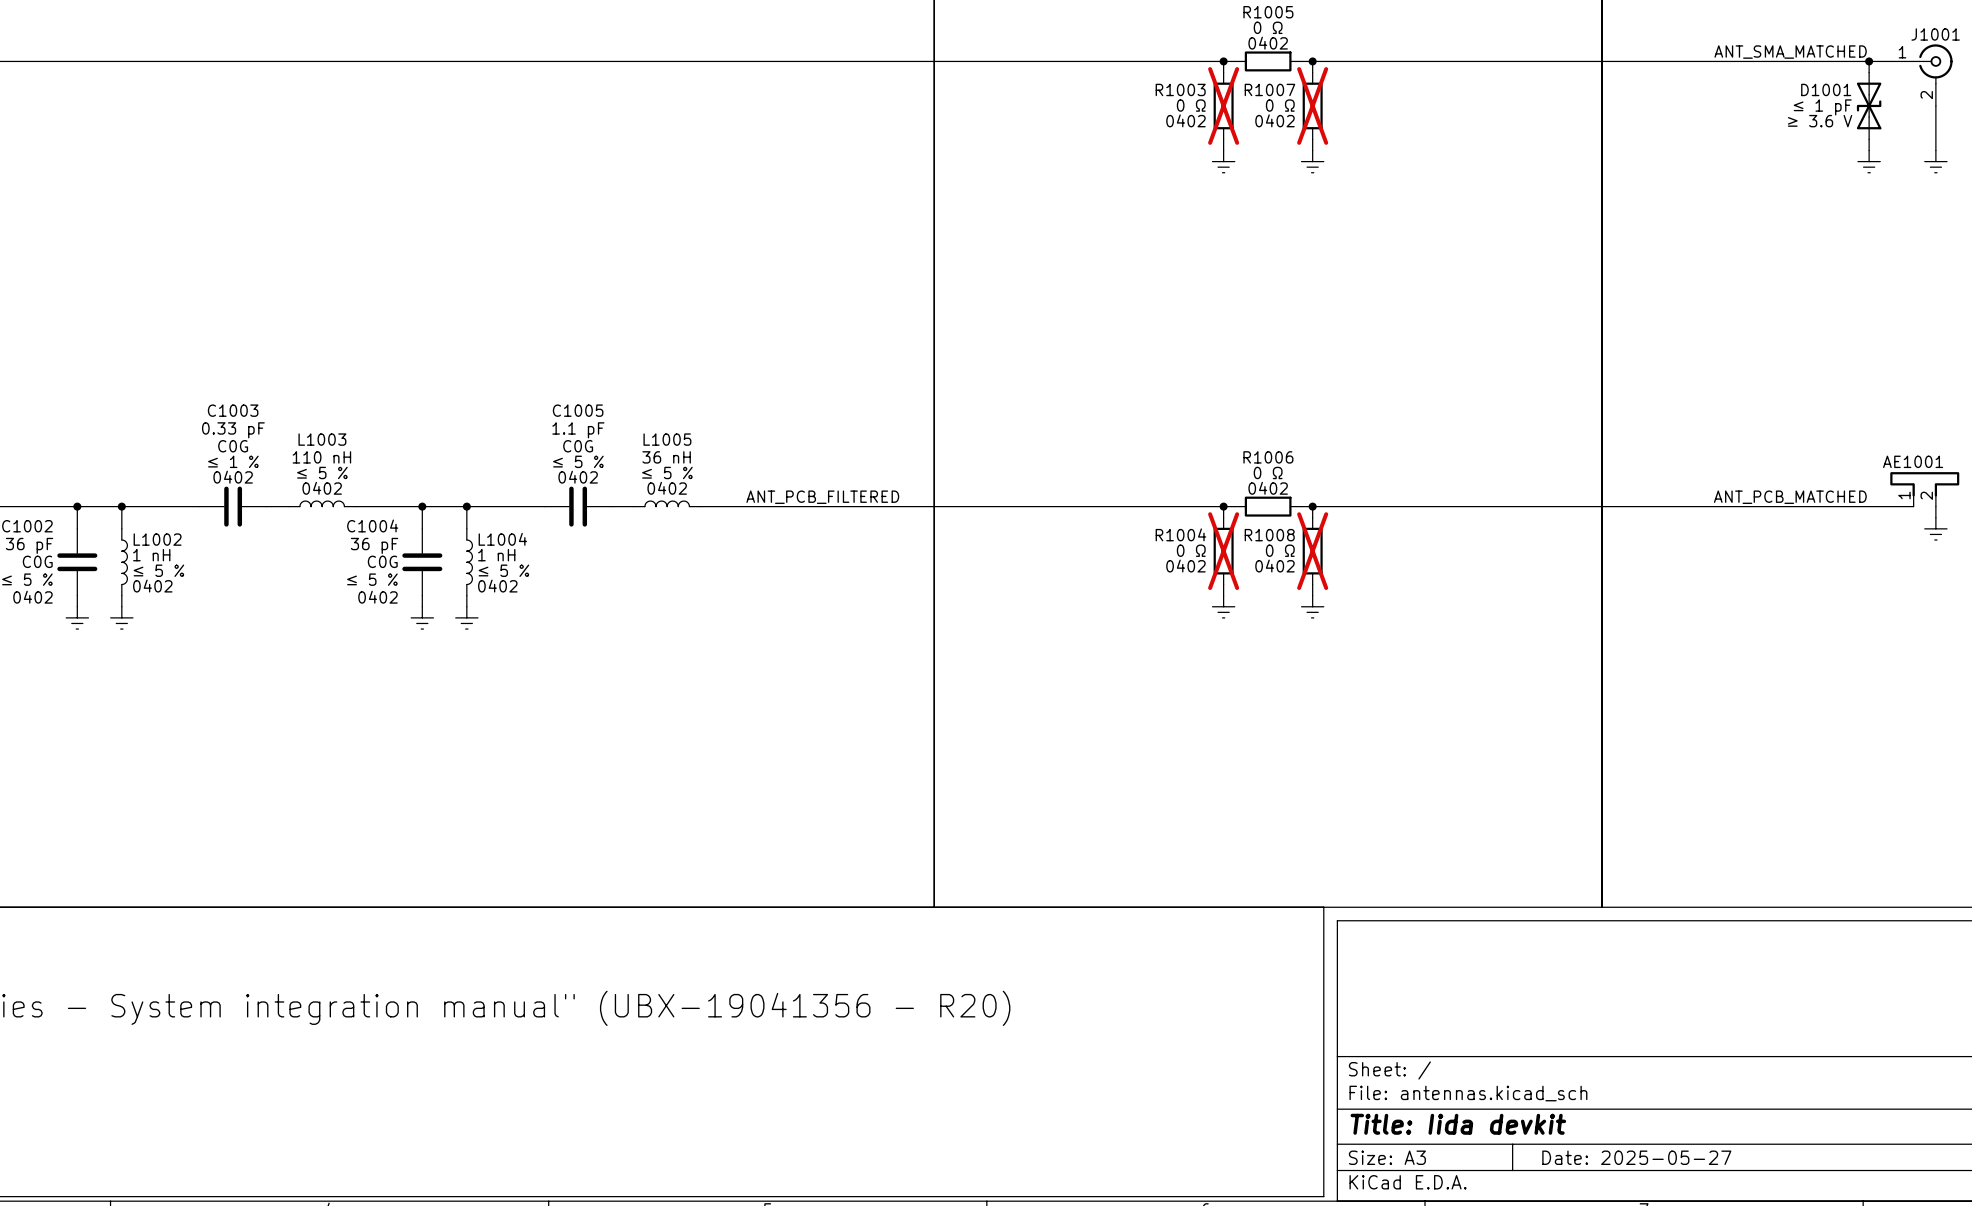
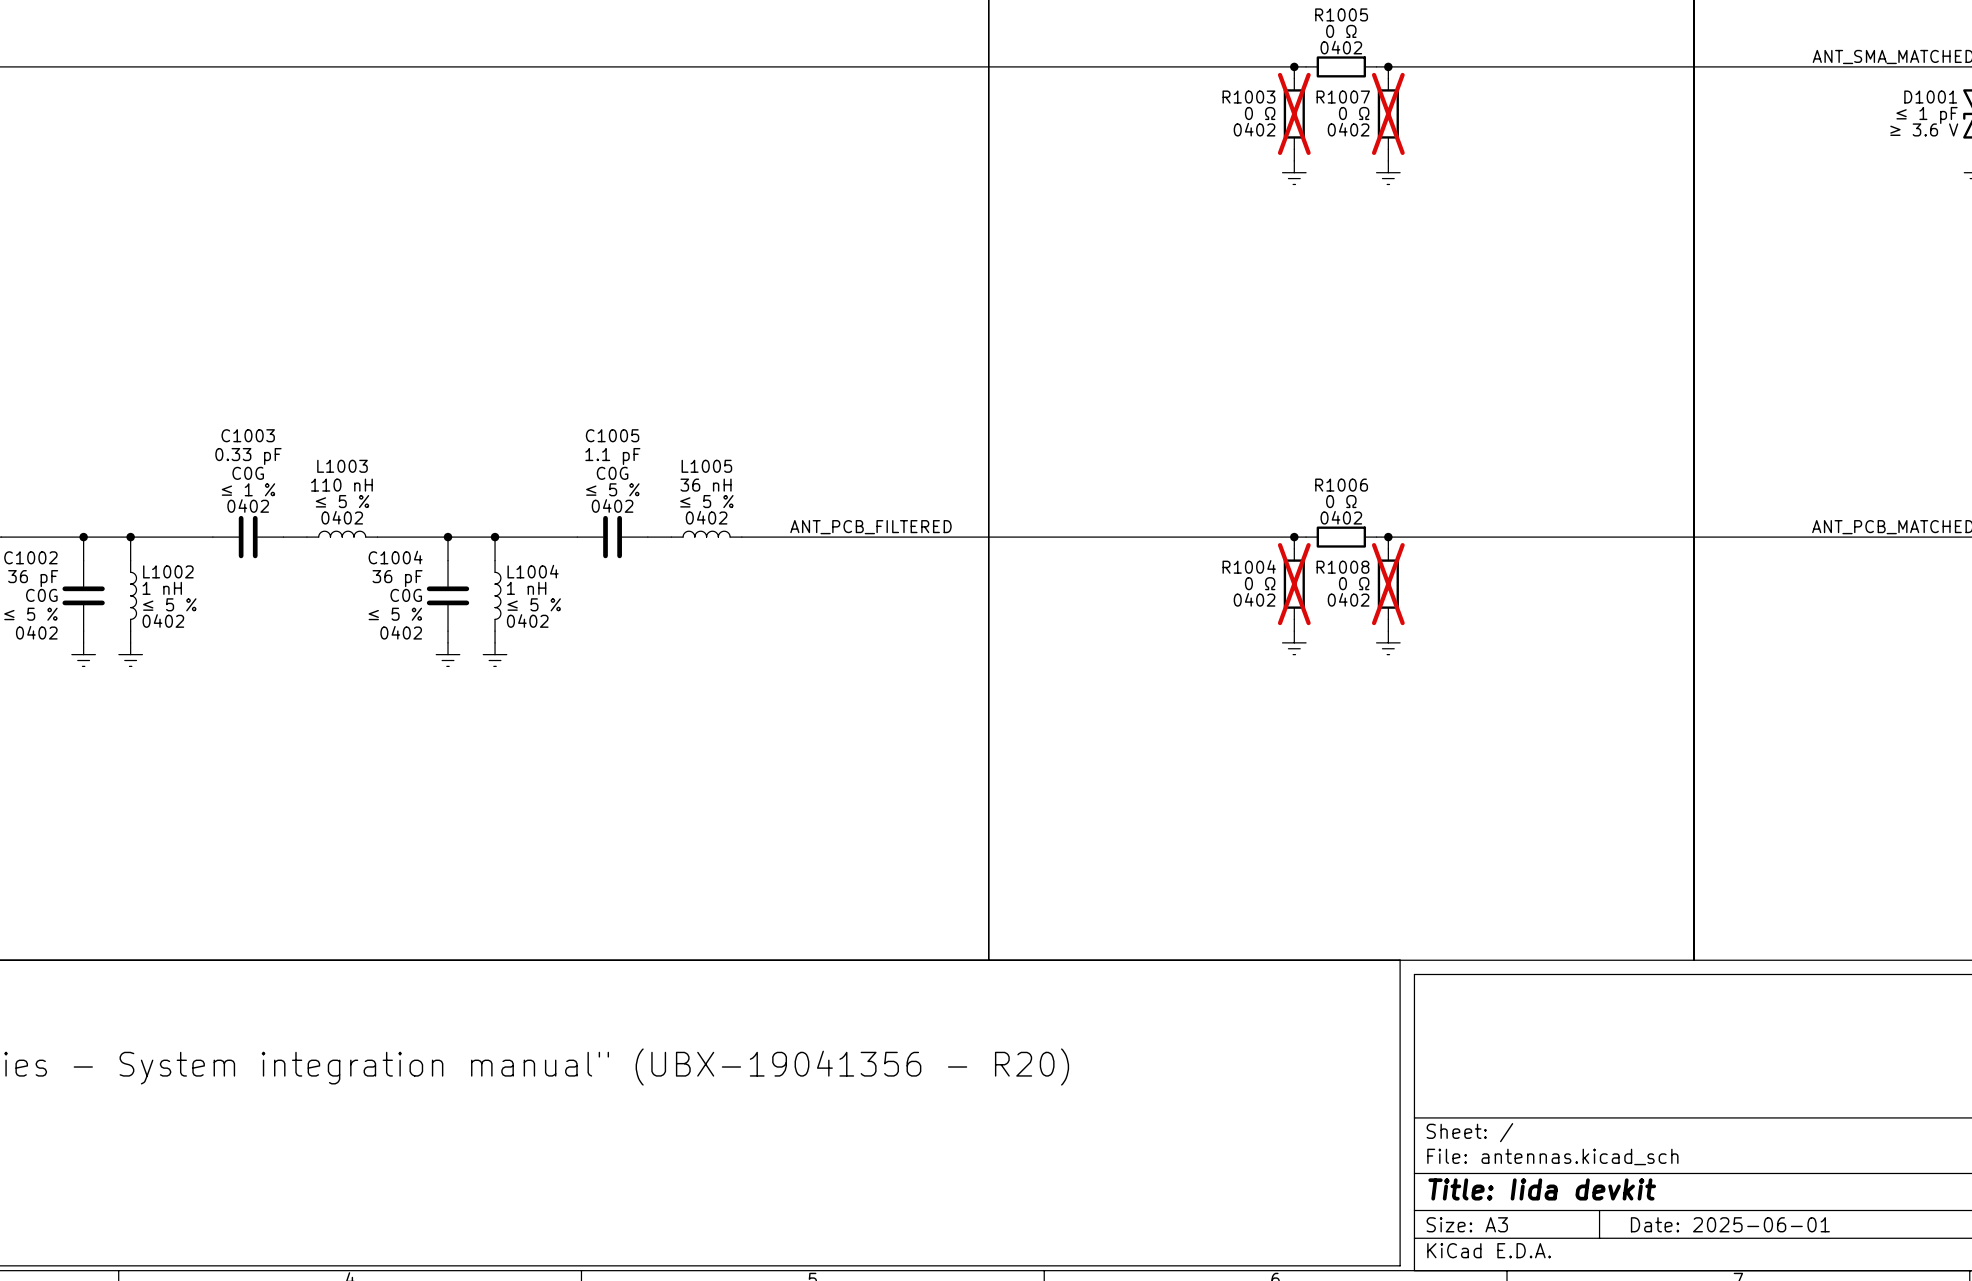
title block: Date: 2025-05-27 (1636, 1157) -> Date: 2025-06-01 (1730, 1224)

